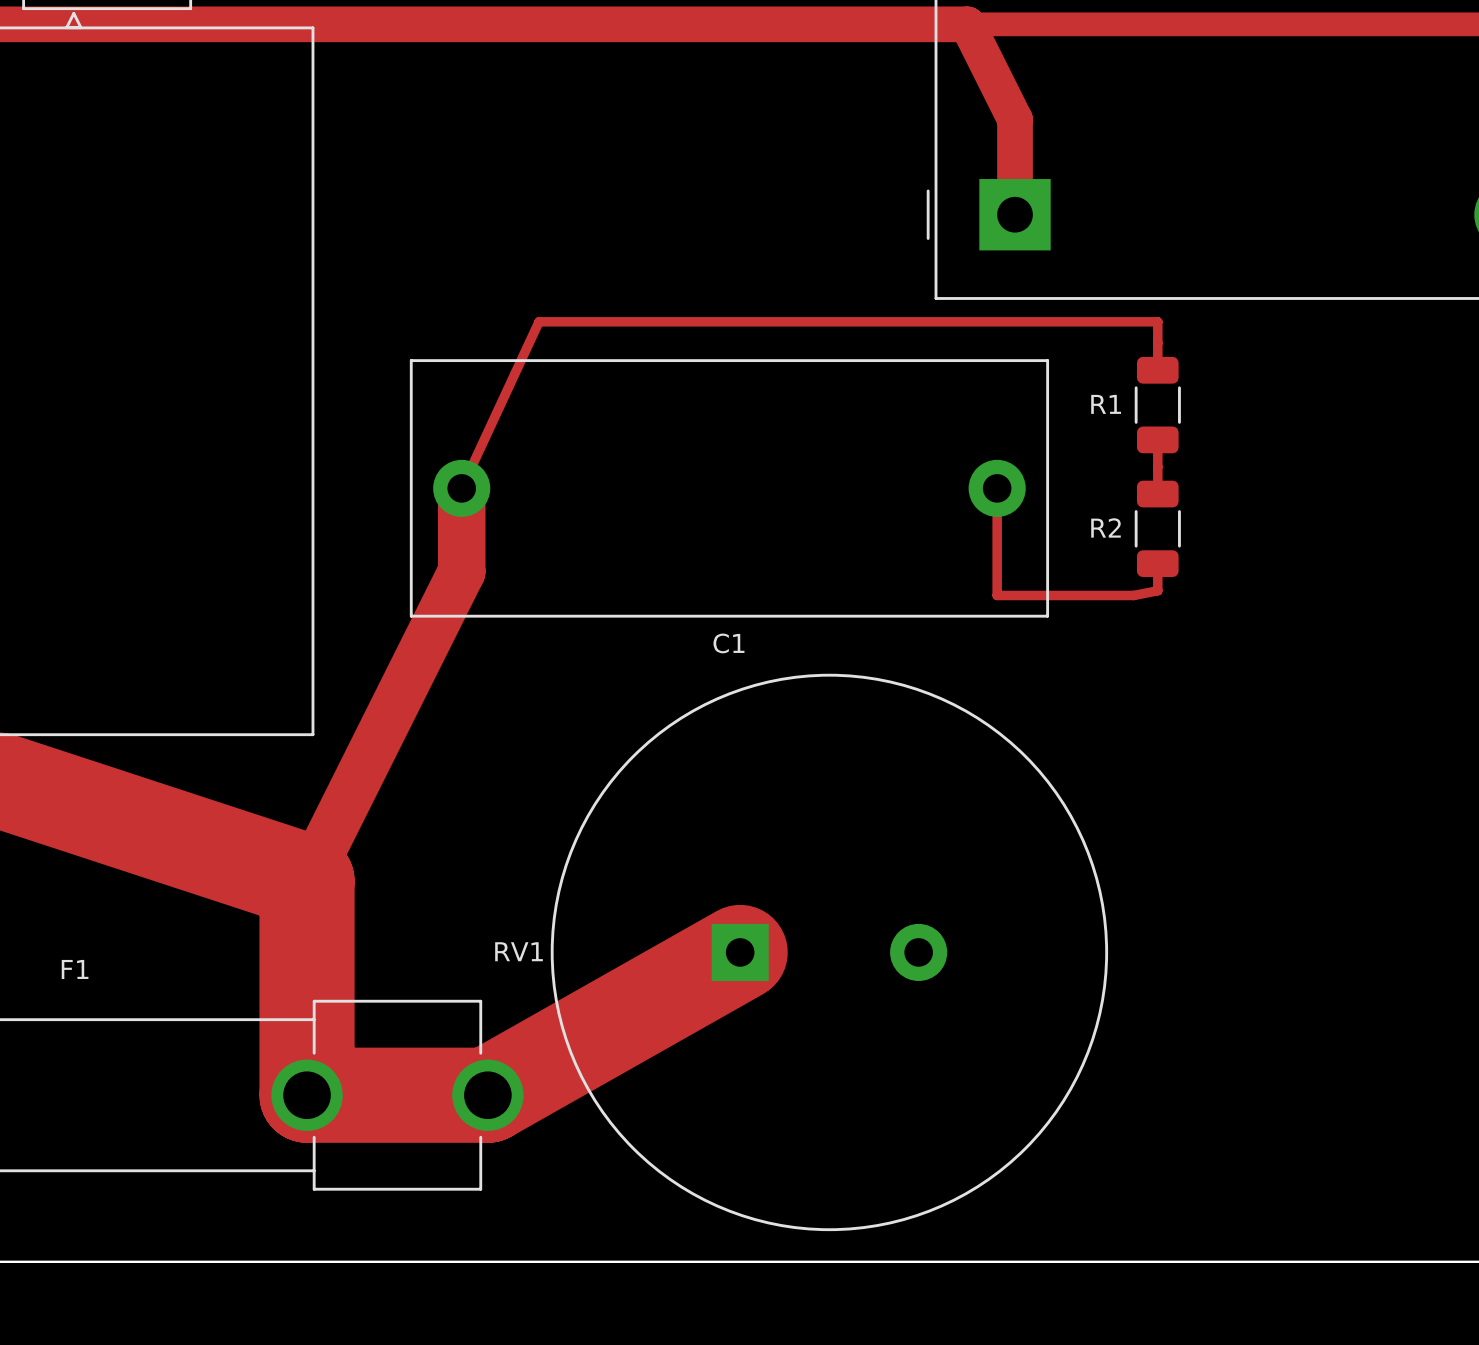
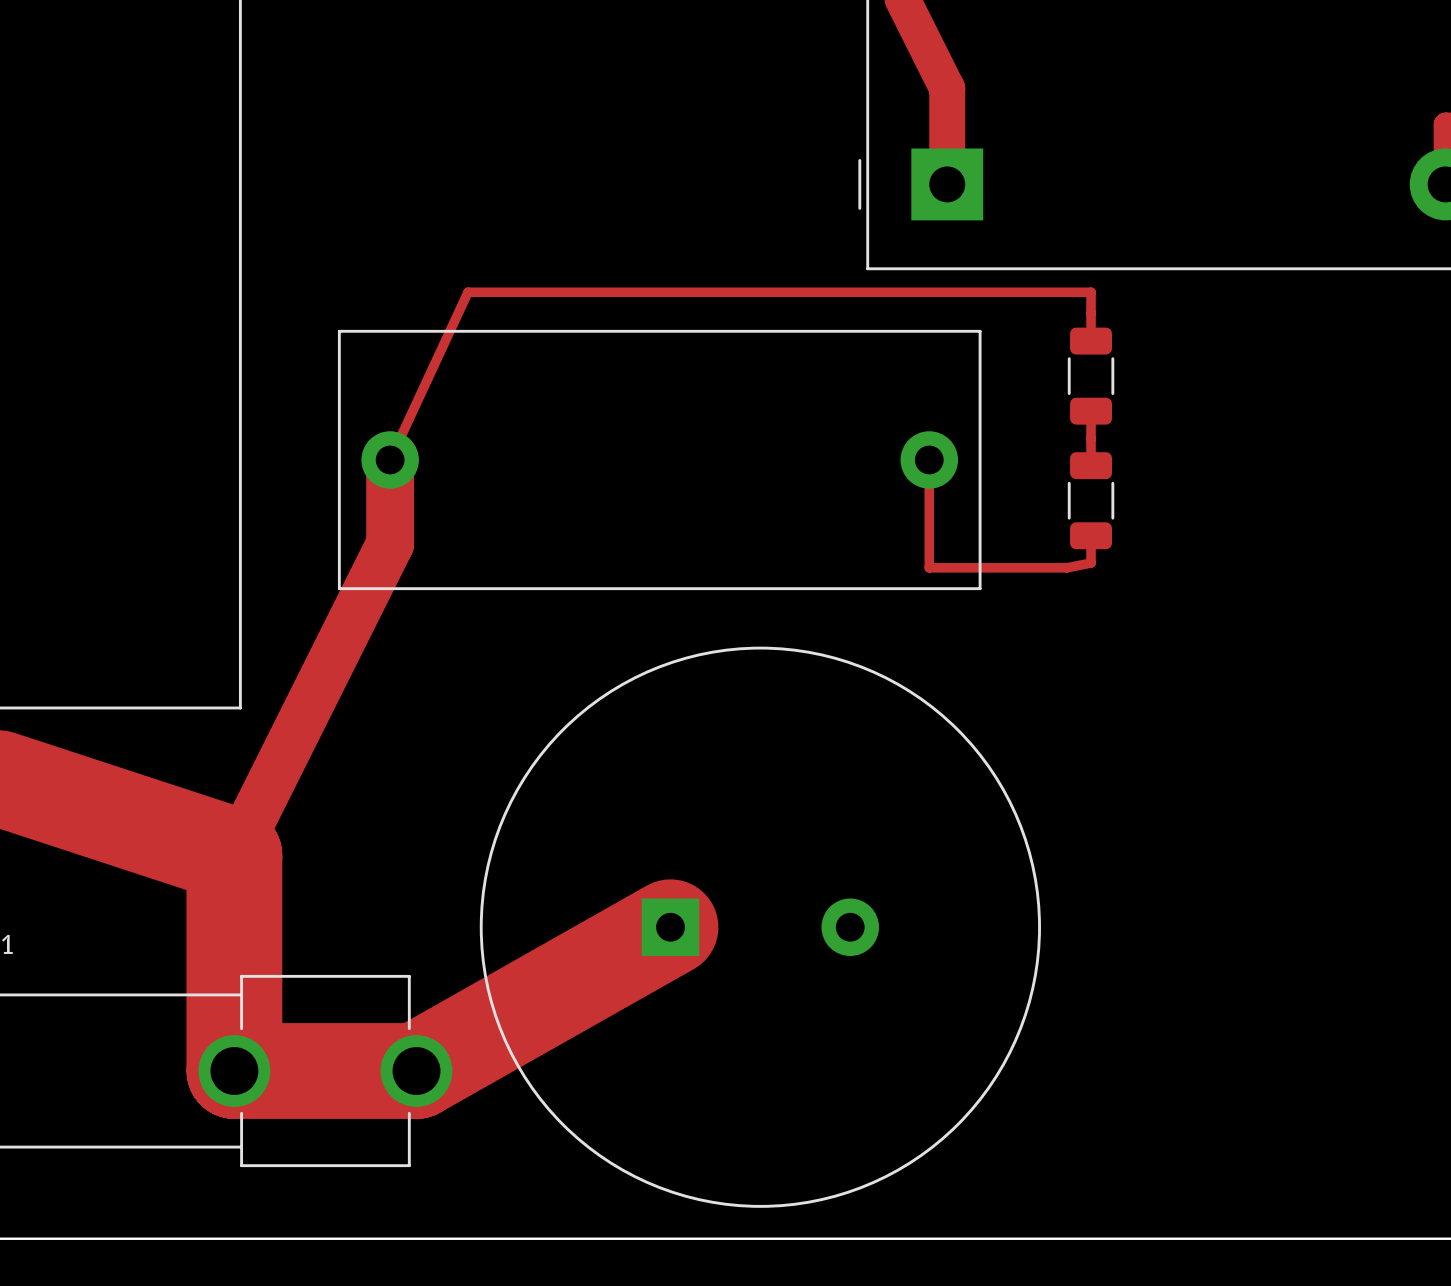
R1 name: R1 (1106, 404) -> none
R2 name: R2 (1106, 527) -> none
C1 name: C1 (728, 643) -> none
RV1 name: RV1 (519, 951) -> none

